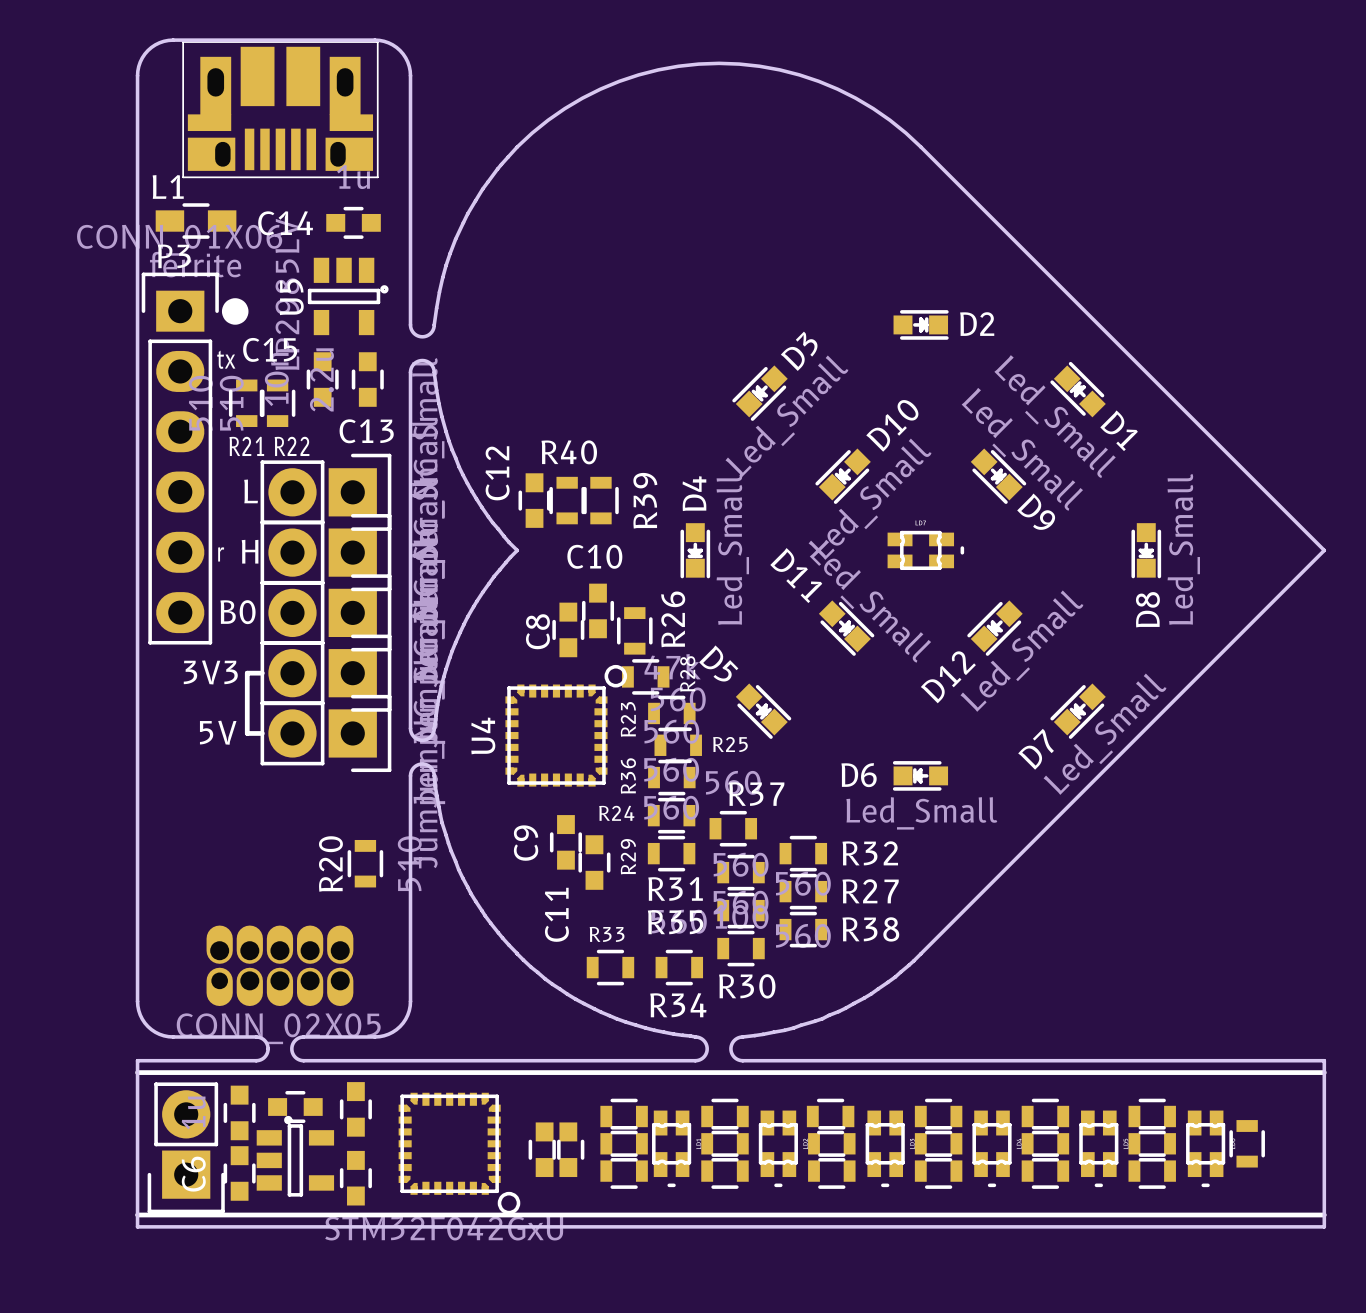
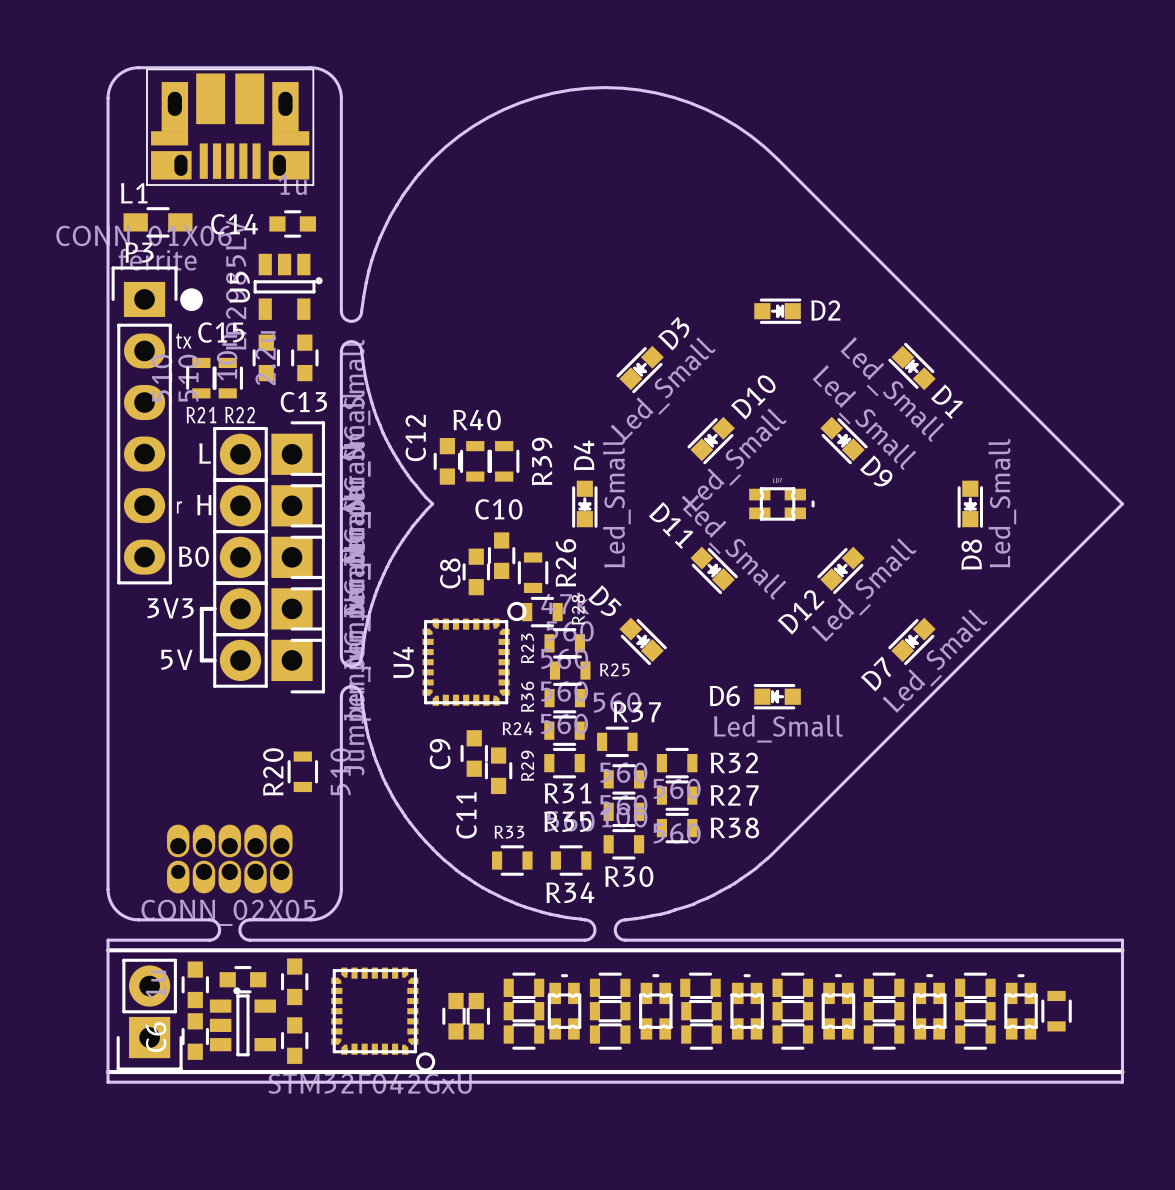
part: none -> (564, 1006)
part: none -> (655, 1006)
part: none -> (747, 1006)
part: none -> (838, 1006)
part: none -> (929, 1006)
part: none -> (1021, 1006)
part: (671, 1148) -> none
part: (778, 1148) -> none
part: (885, 1148) -> none
part: (992, 1148) -> none
part: (1098, 1148) -> none
part: (1205, 1148) -> none

